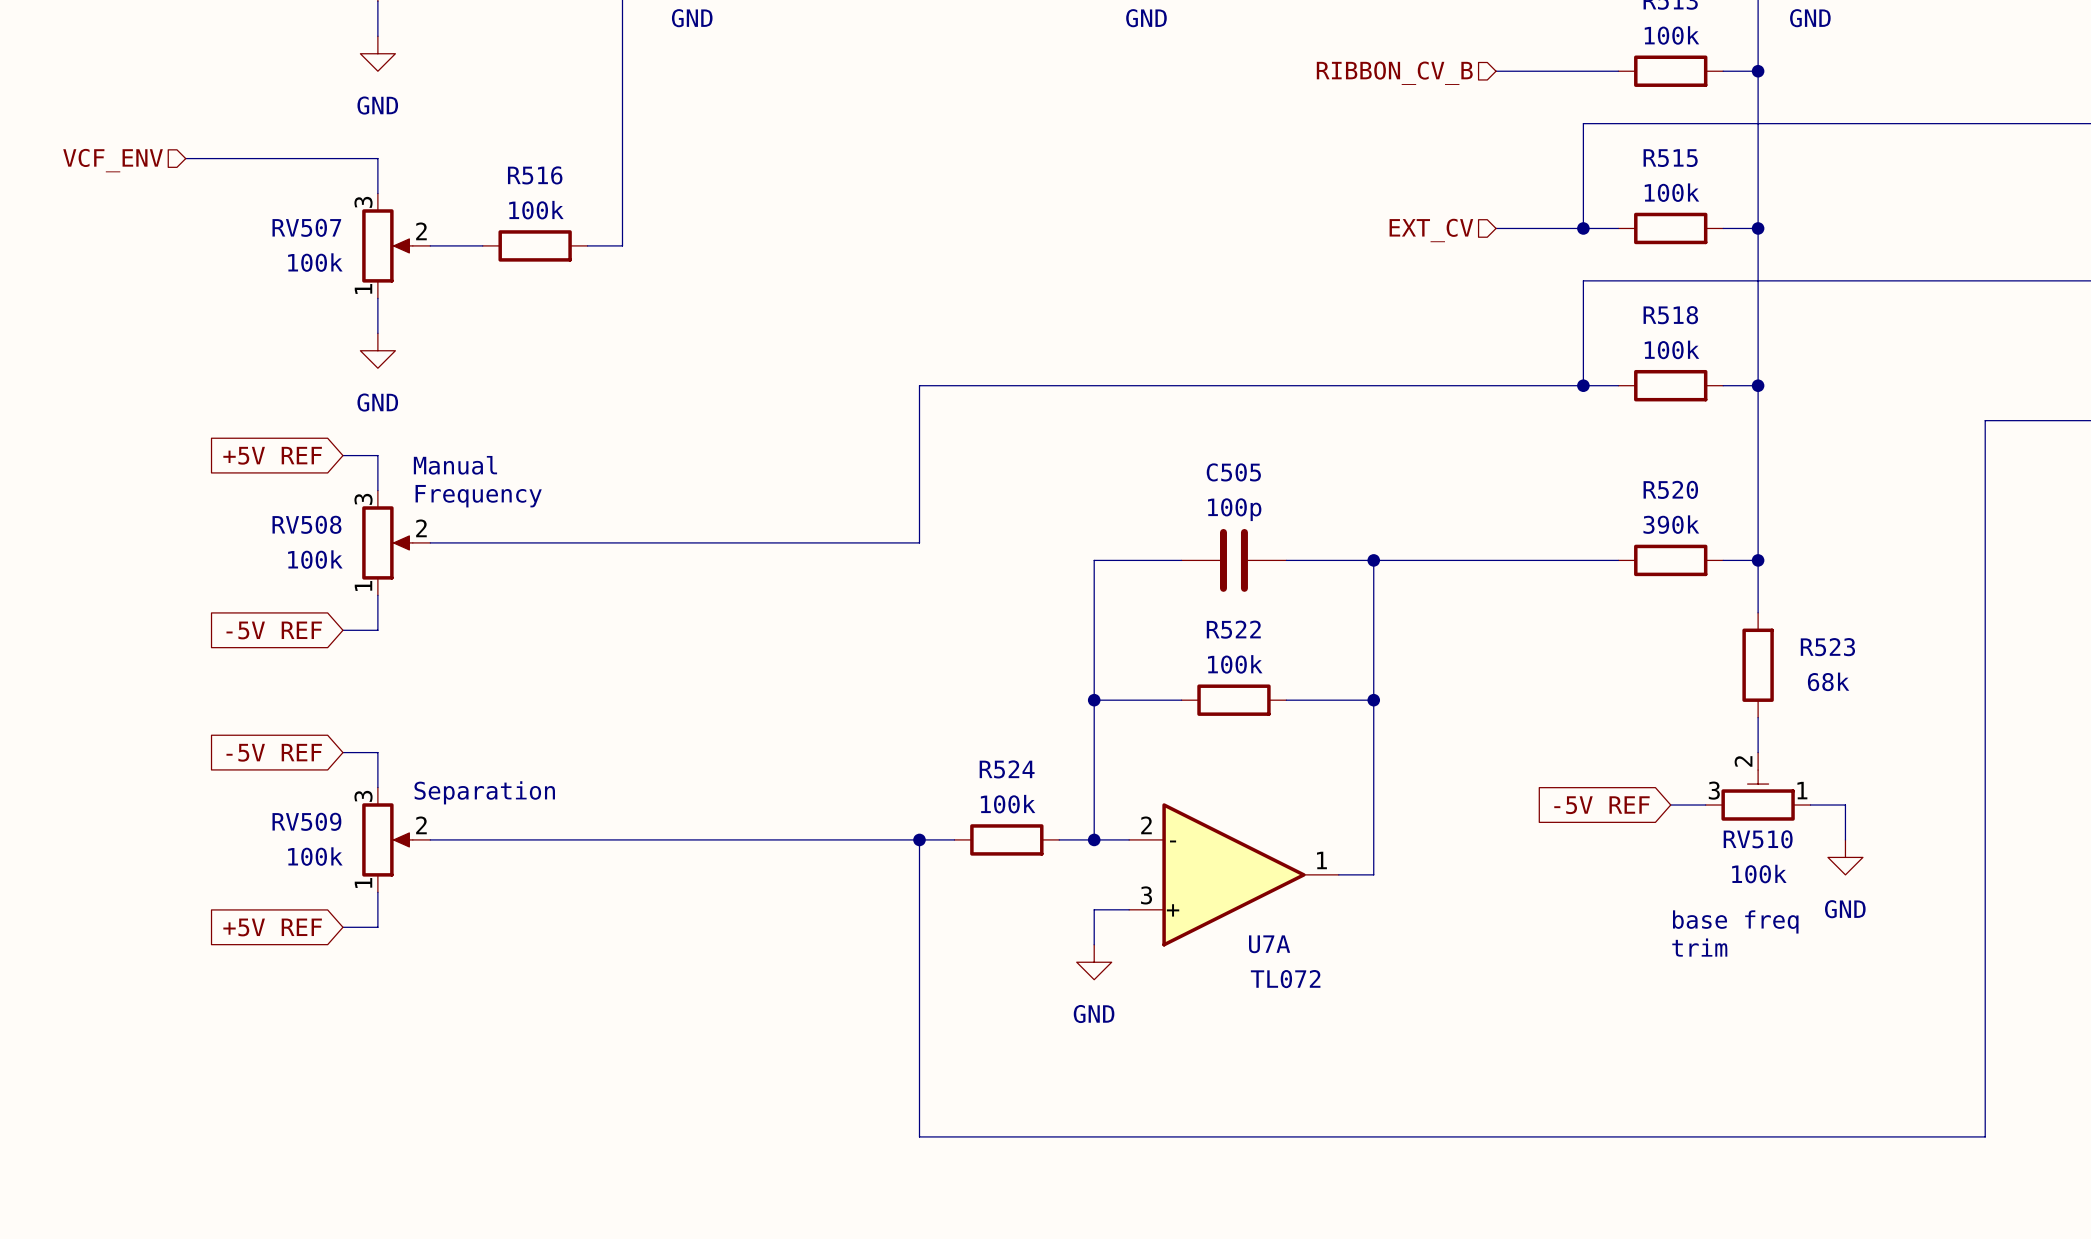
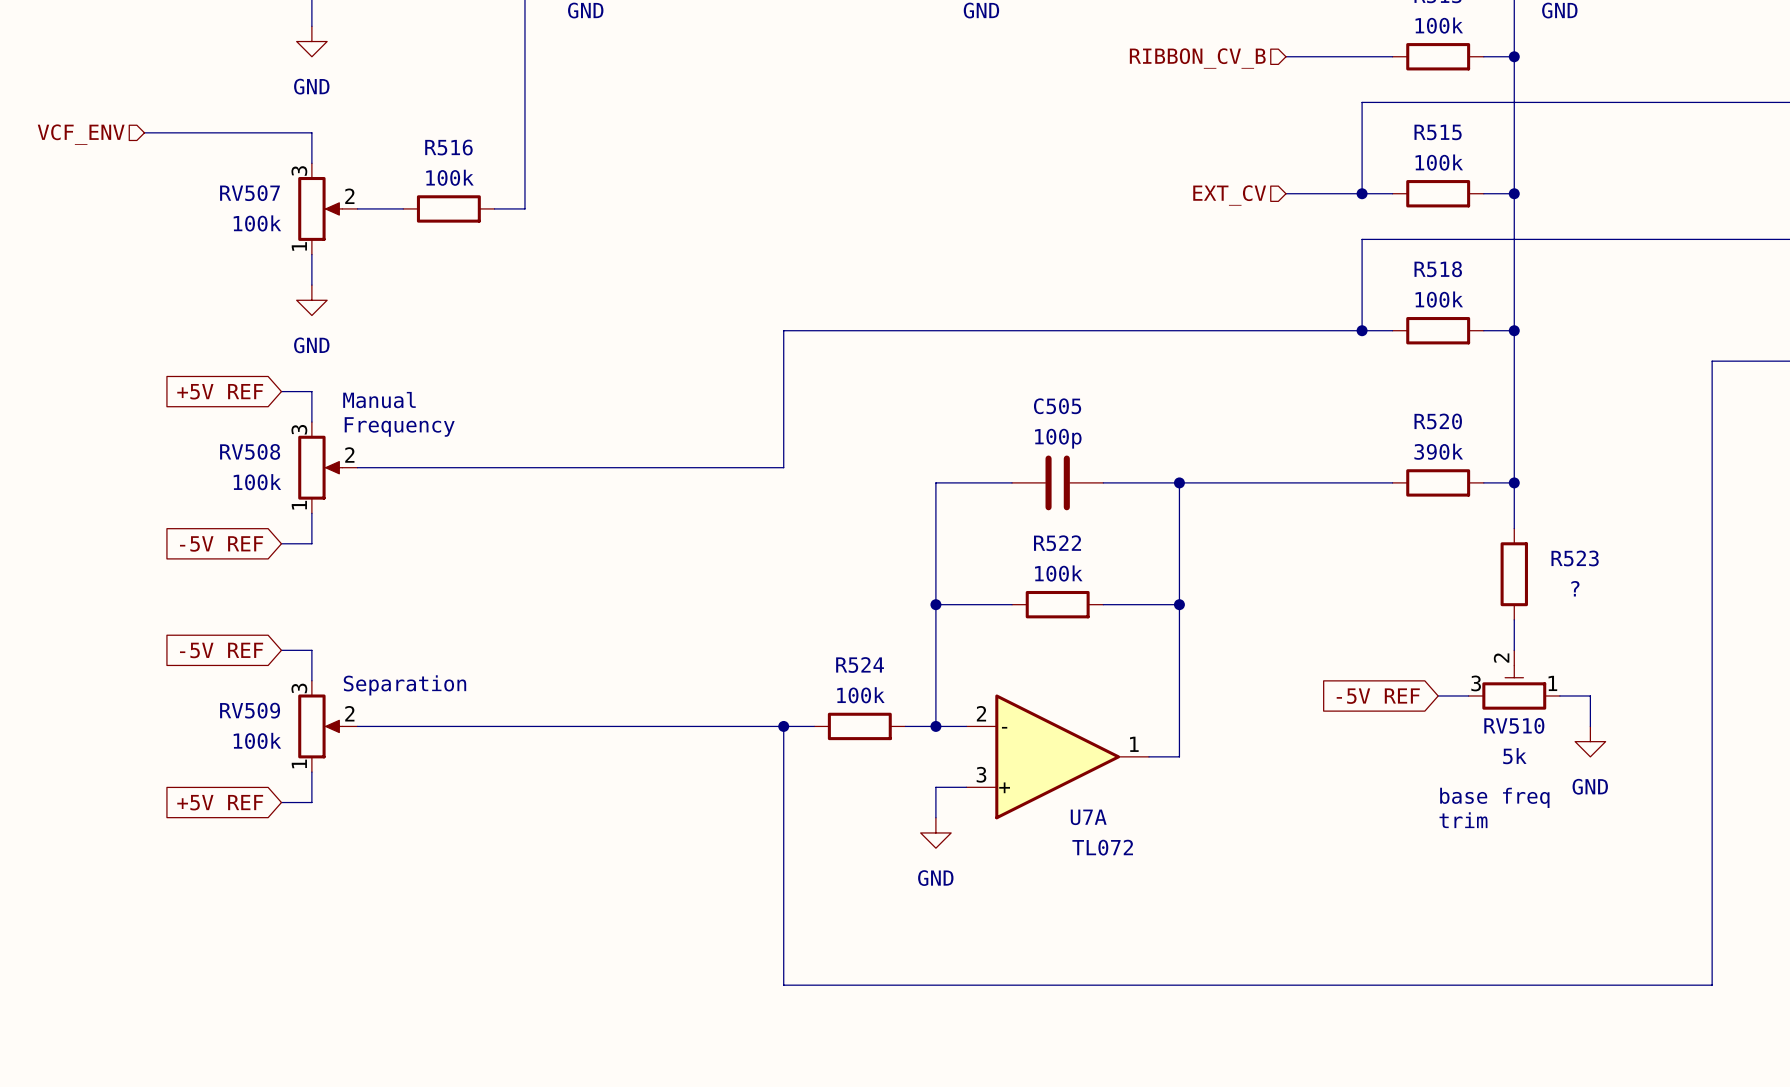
R523 value: 68k (1828, 681) -> ? (1575, 588)
RV510 value: 100k (1759, 874) -> 5k (1514, 756)

